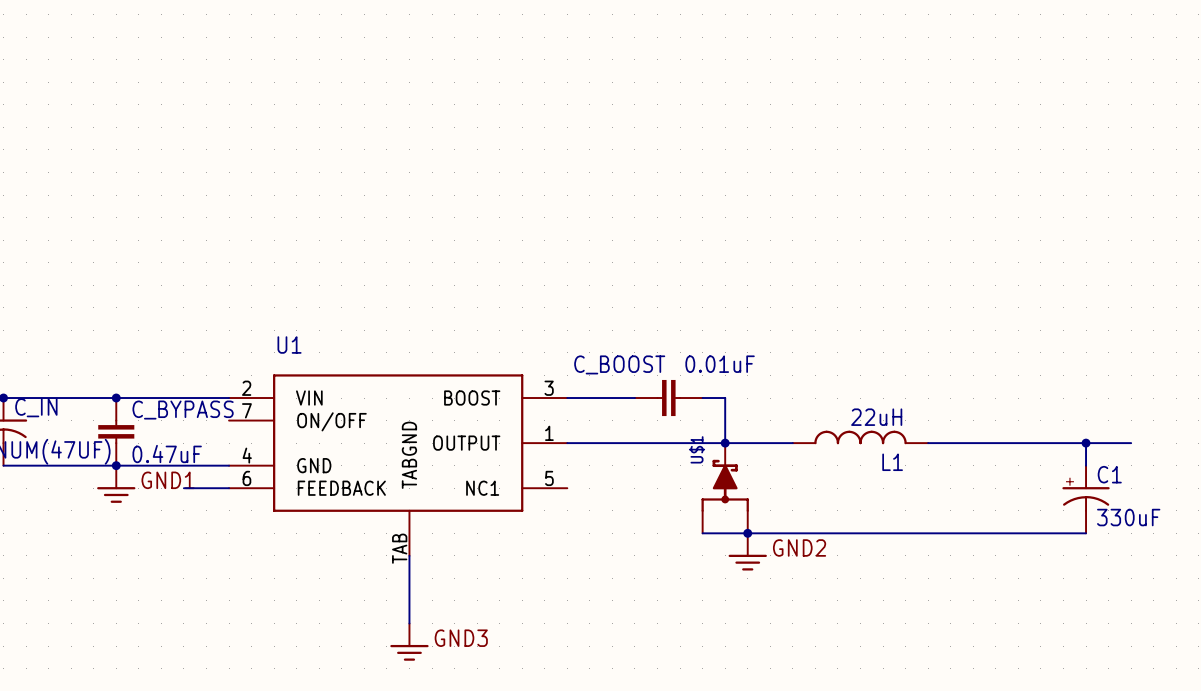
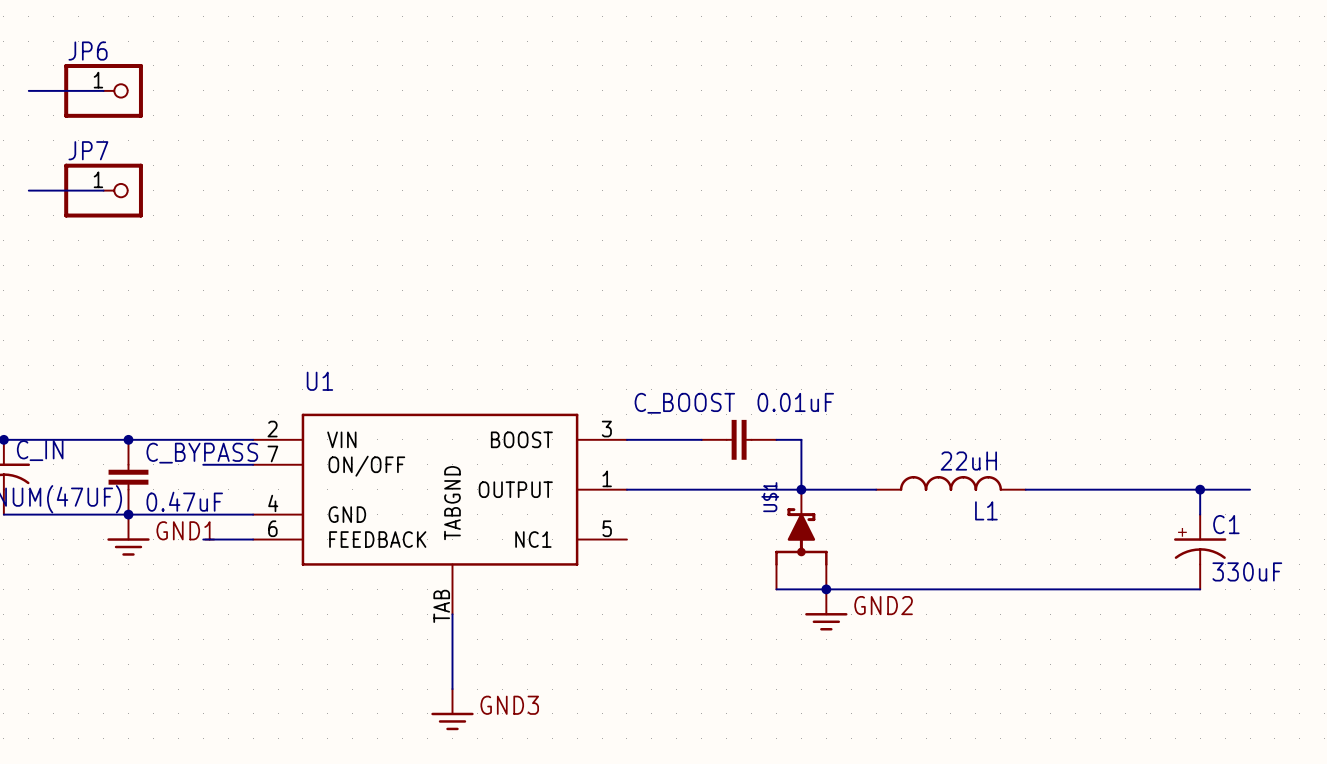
wire: none -> (28, 90) (103, 90)
JP6: none -> (103, 90)
wire: none -> (28, 190) (103, 190)
JP7: none -> (103, 190)
wire: none -> (203, 464) (253, 464)

